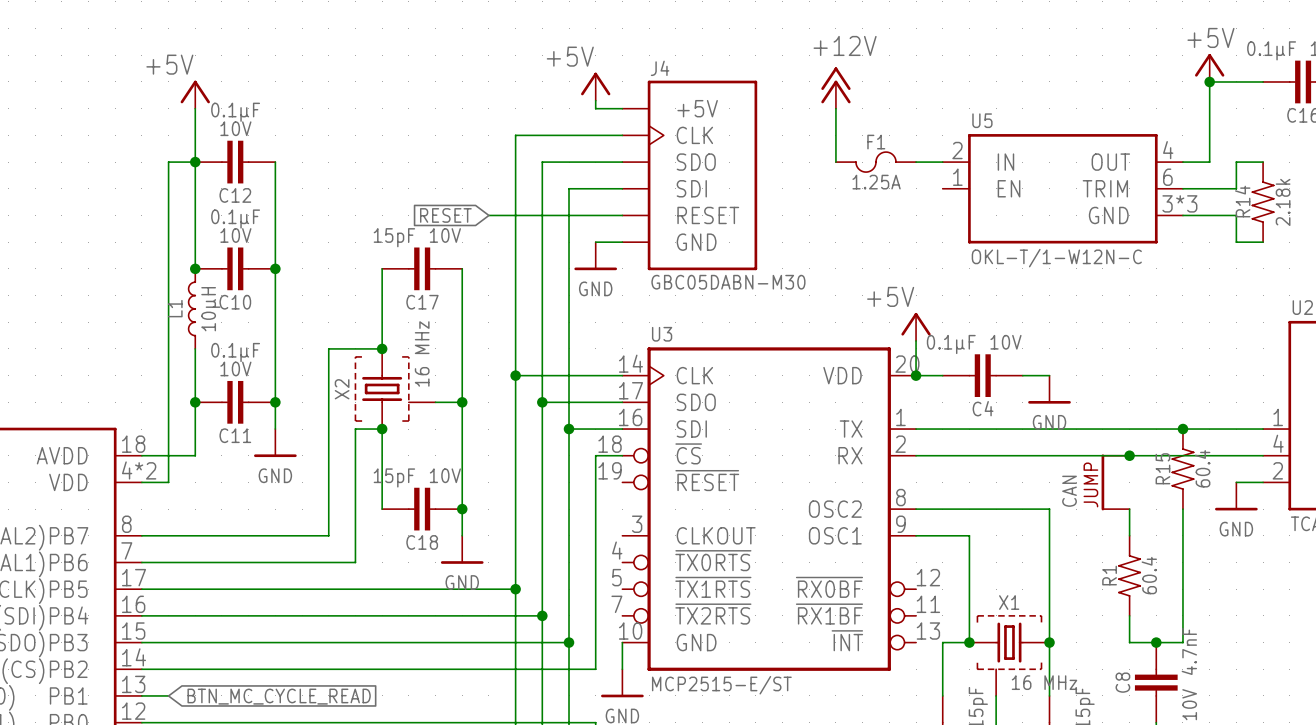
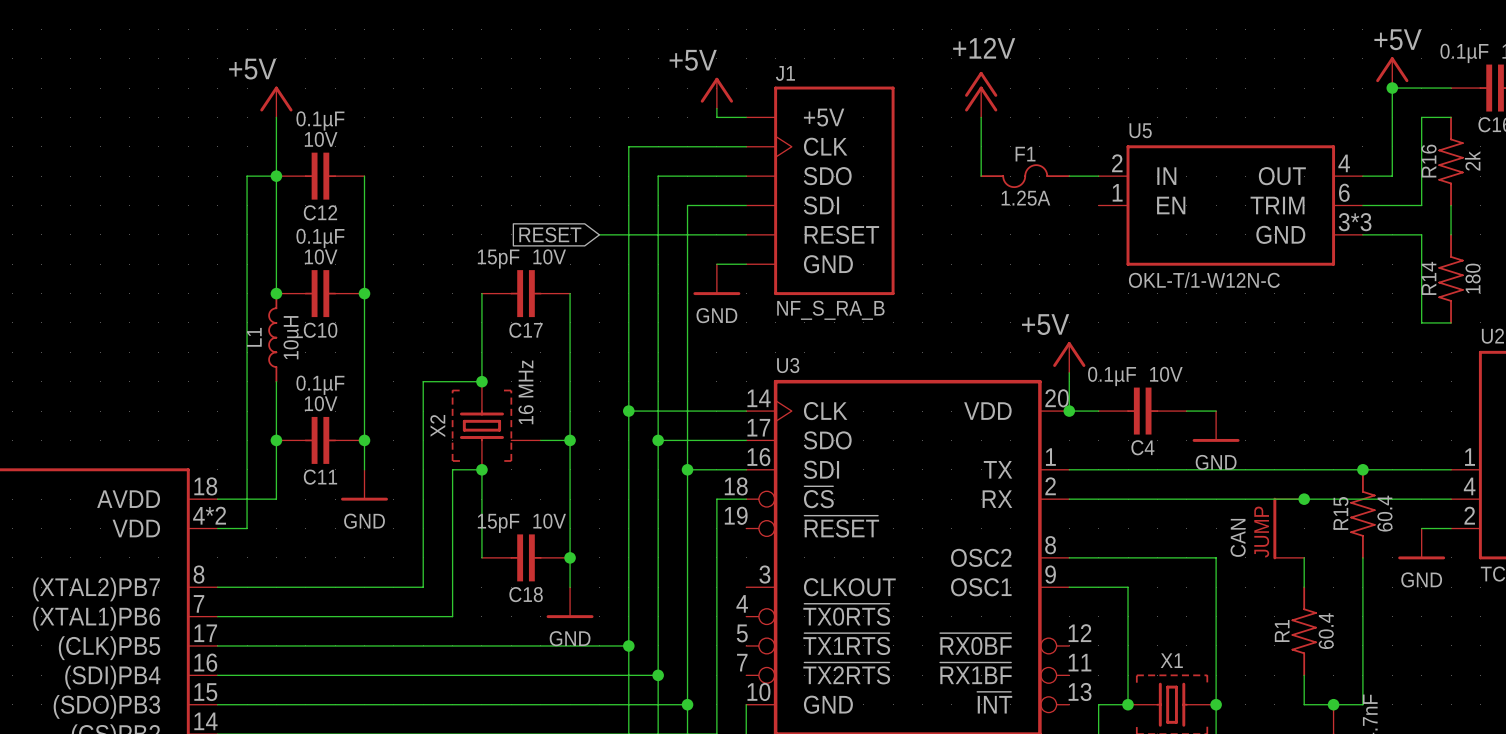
J4 name: J4 (660, 68) -> J1 (785, 73)
R16: none -> (1451, 161)
wire: (1236, 162) (1263, 162) -> (1421, 176) (1421, 117) (1451, 117)
wire: none -> (1451, 205) (1451, 234)
R14 position: (1263, 202) -> (1451, 278)
R14 text: 2.18k (1283, 202) -> 180 (1473, 278)
wire: (1236, 242) (1263, 242) -> (1421, 264) (1421, 322) (1451, 322)
J4 text: GBC05DABN-M30 (728, 282) -> NF_S_RA_B (830, 310)

